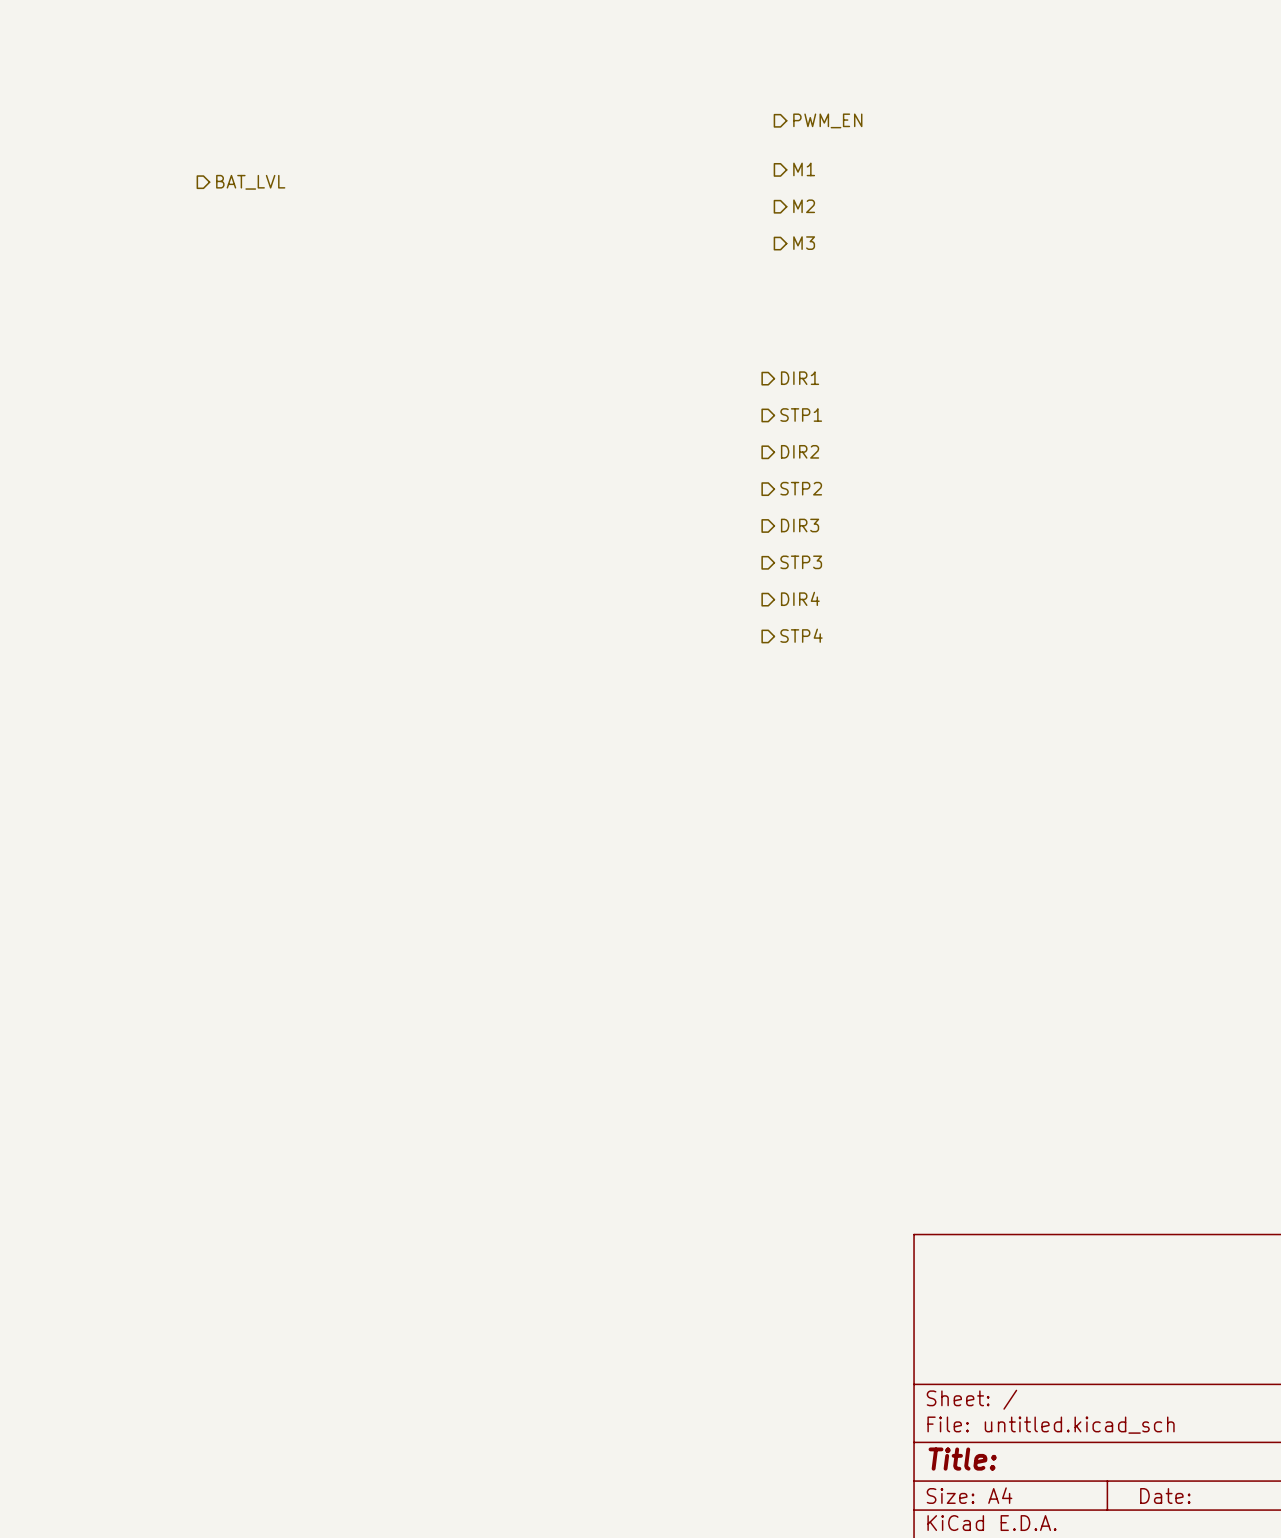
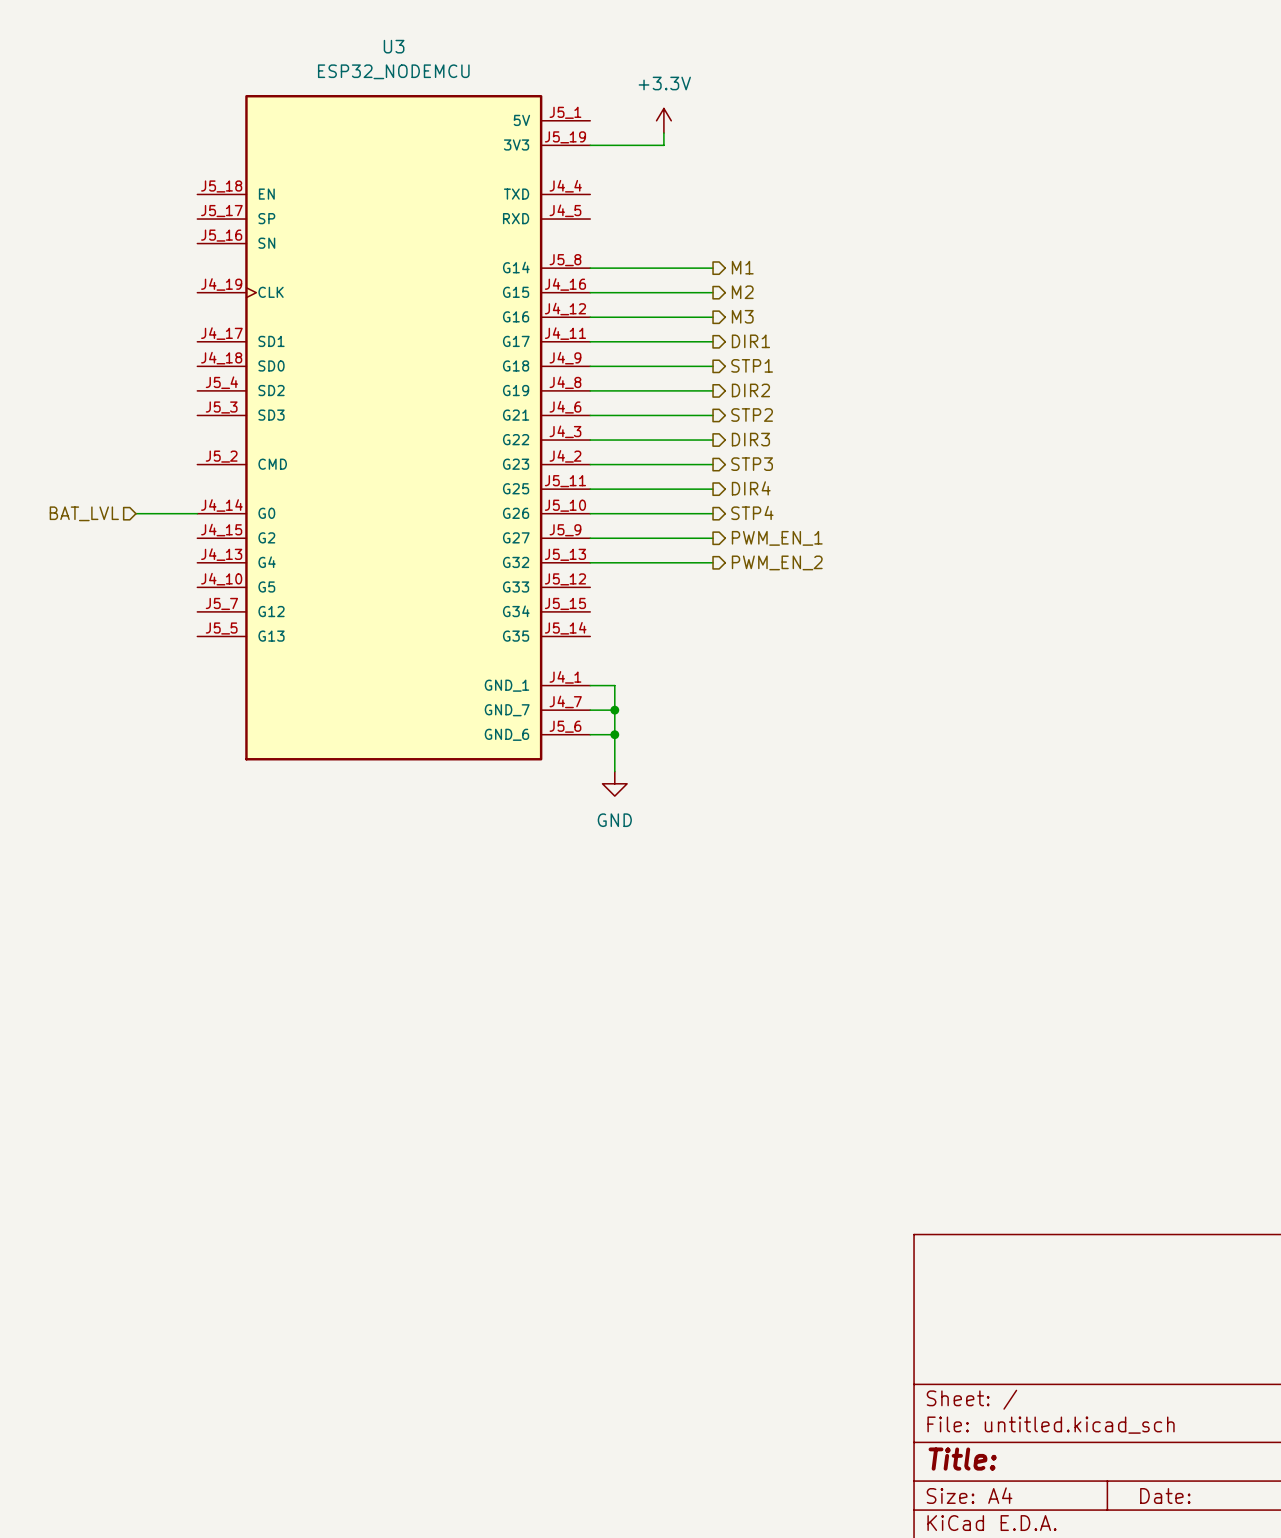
power symbol: none -> +3.3V (663, 120)
hierarchical label: PWM_EN (827, 120) -> none
wire: none -> (663, 133) (663, 145) (590, 145)
hierarchical label position: M1 (804, 169) -> M1 (742, 267)
hierarchical label: BAT_LVL (250, 182) -> none
hierarchical label position: M2 (804, 206) -> M2 (742, 292)
hierarchical label position: M3 (804, 243) -> M3 (742, 316)
wire: none -> (590, 268) (713, 268)
wire: none -> (590, 292) (713, 292)
wire: none -> (590, 317) (713, 317)
wire: none -> (590, 341) (713, 341)
wire: none -> (590, 366) (713, 366)
hierarchical label position: DIR1 (800, 378) -> DIR1 (750, 341)
wire: none -> (590, 390) (713, 390)
wire: none -> (590, 415) (713, 415)
hierarchical label position: STP1 (801, 415) -> STP1 (752, 365)
U3: none -> ESP32_NODEMCU (393, 427)
wire: none -> (590, 440) (713, 440)
hierarchical label position: DIR2 (800, 451) -> DIR2 (750, 390)
wire: none -> (590, 464) (713, 464)
hierarchical label position: STP2 (801, 488) -> STP2 (752, 415)
wire: none -> (590, 489) (713, 489)
hierarchical label: none -> BAT_LVL (84, 513)
wire: none -> (135, 513) (197, 513)
wire: none -> (590, 513) (713, 513)
hierarchical label position: DIR3 (800, 525) -> DIR3 (750, 439)
wire: none -> (590, 538) (713, 538)
hierarchical label: none -> PWM_EN_1 (777, 538)
wire: none -> (590, 562) (713, 562)
hierarchical label: none -> PWM_EN_2 (777, 562)
hierarchical label position: STP3 (801, 562) -> STP3 (752, 464)
hierarchical label position: DIR4 (800, 598) -> DIR4 (751, 488)
hierarchical label position: STP4 (801, 635) -> STP4 (752, 512)
wire: none -> (590, 685) (614, 685) (614, 771)
wire: none -> (590, 710) (614, 710)
junction: none -> (614, 710)
wire: none -> (590, 734) (614, 734)
junction: none -> (614, 734)
power symbol: none -> GND (614, 783)

